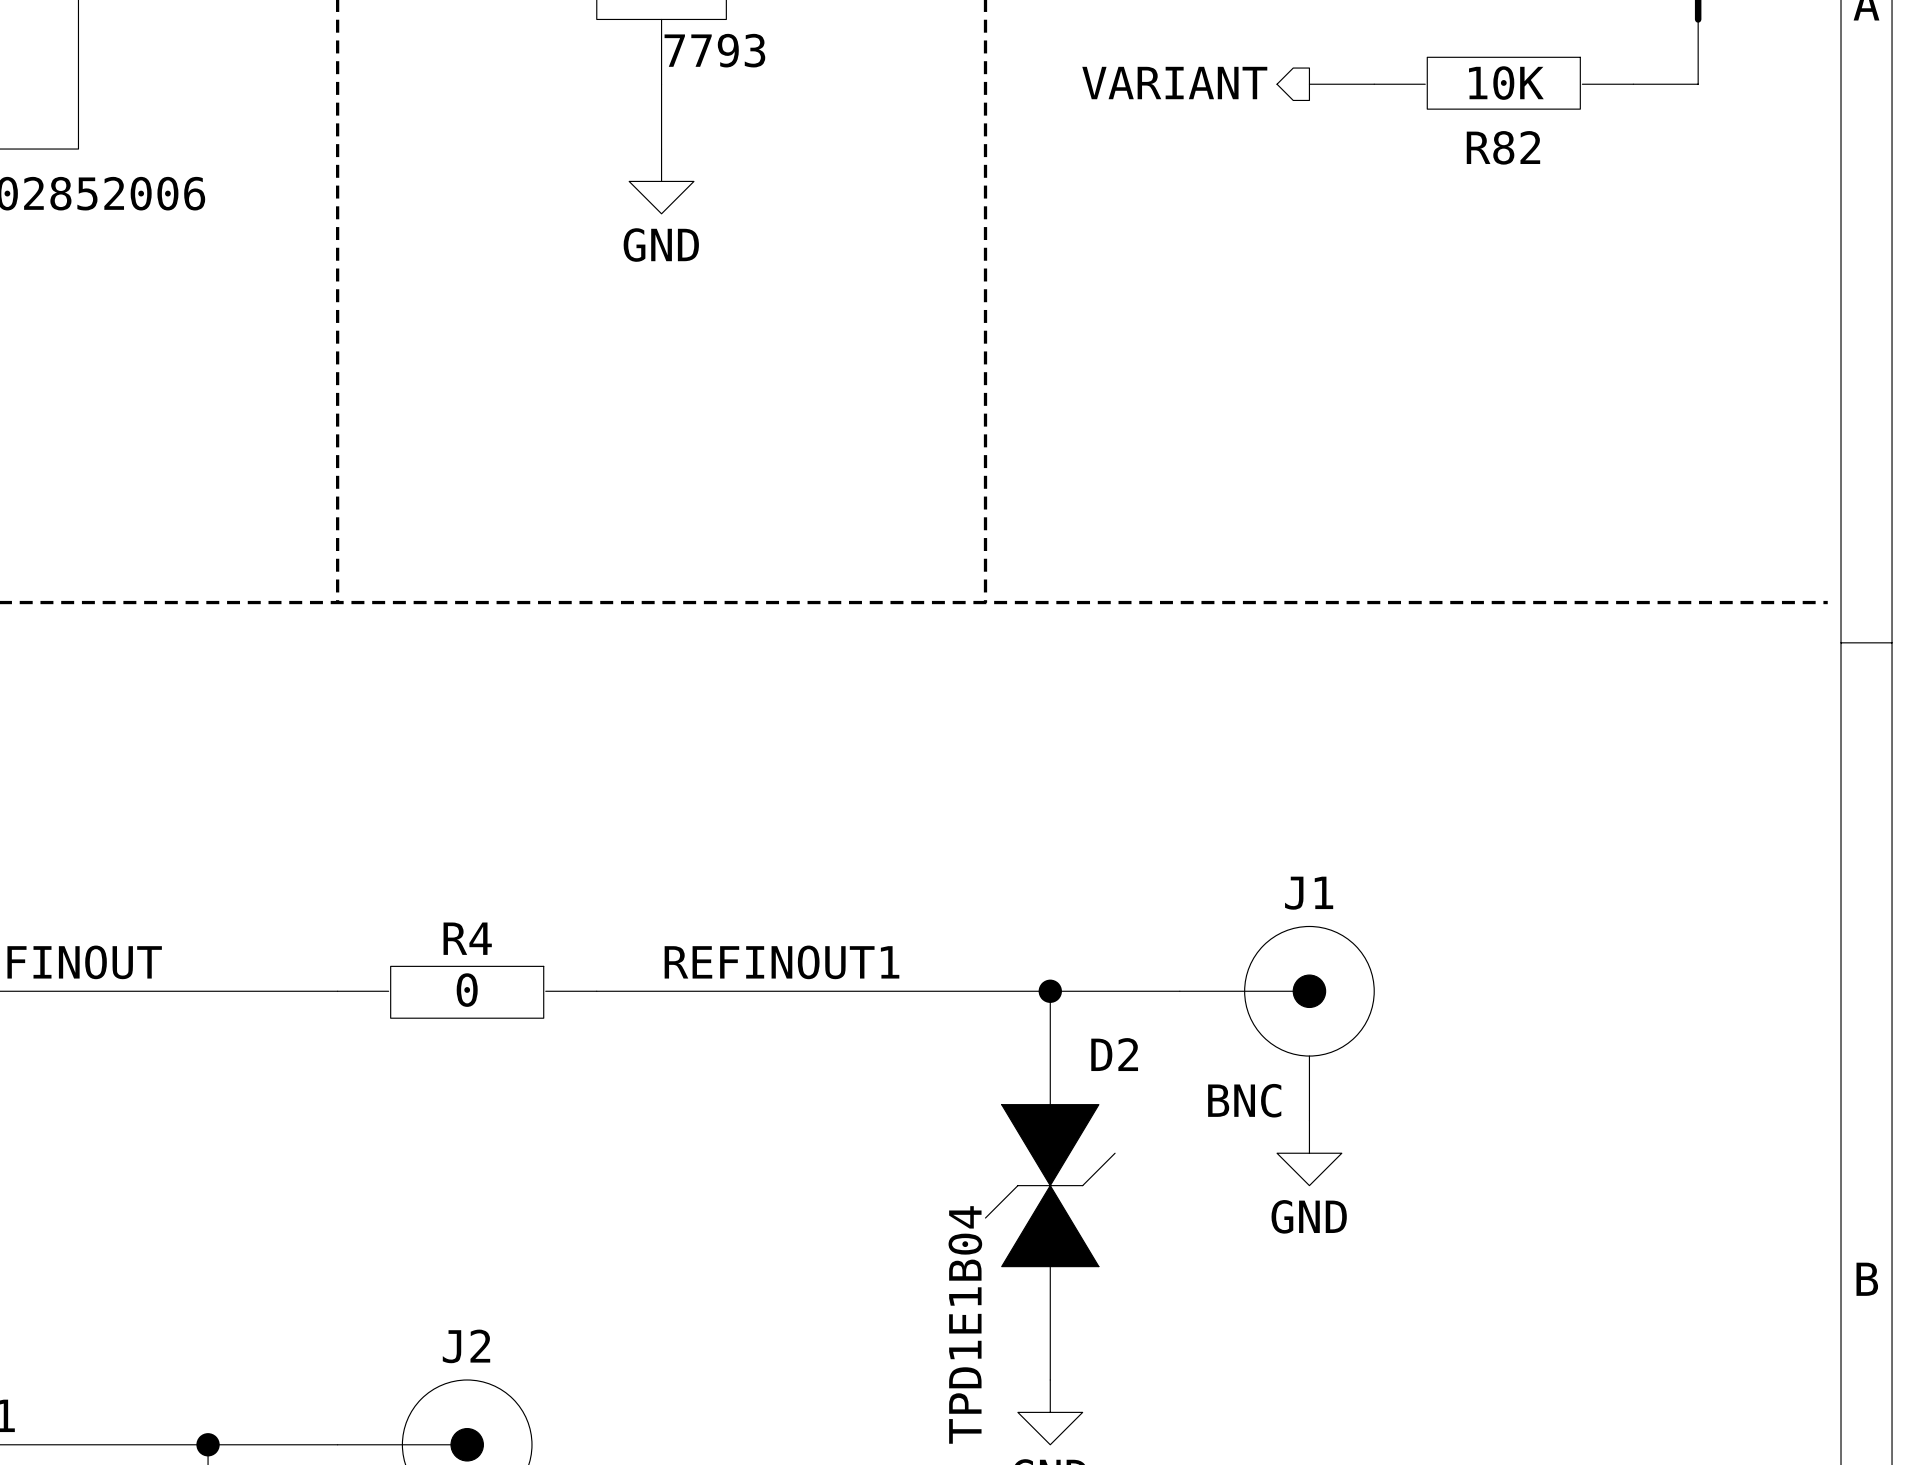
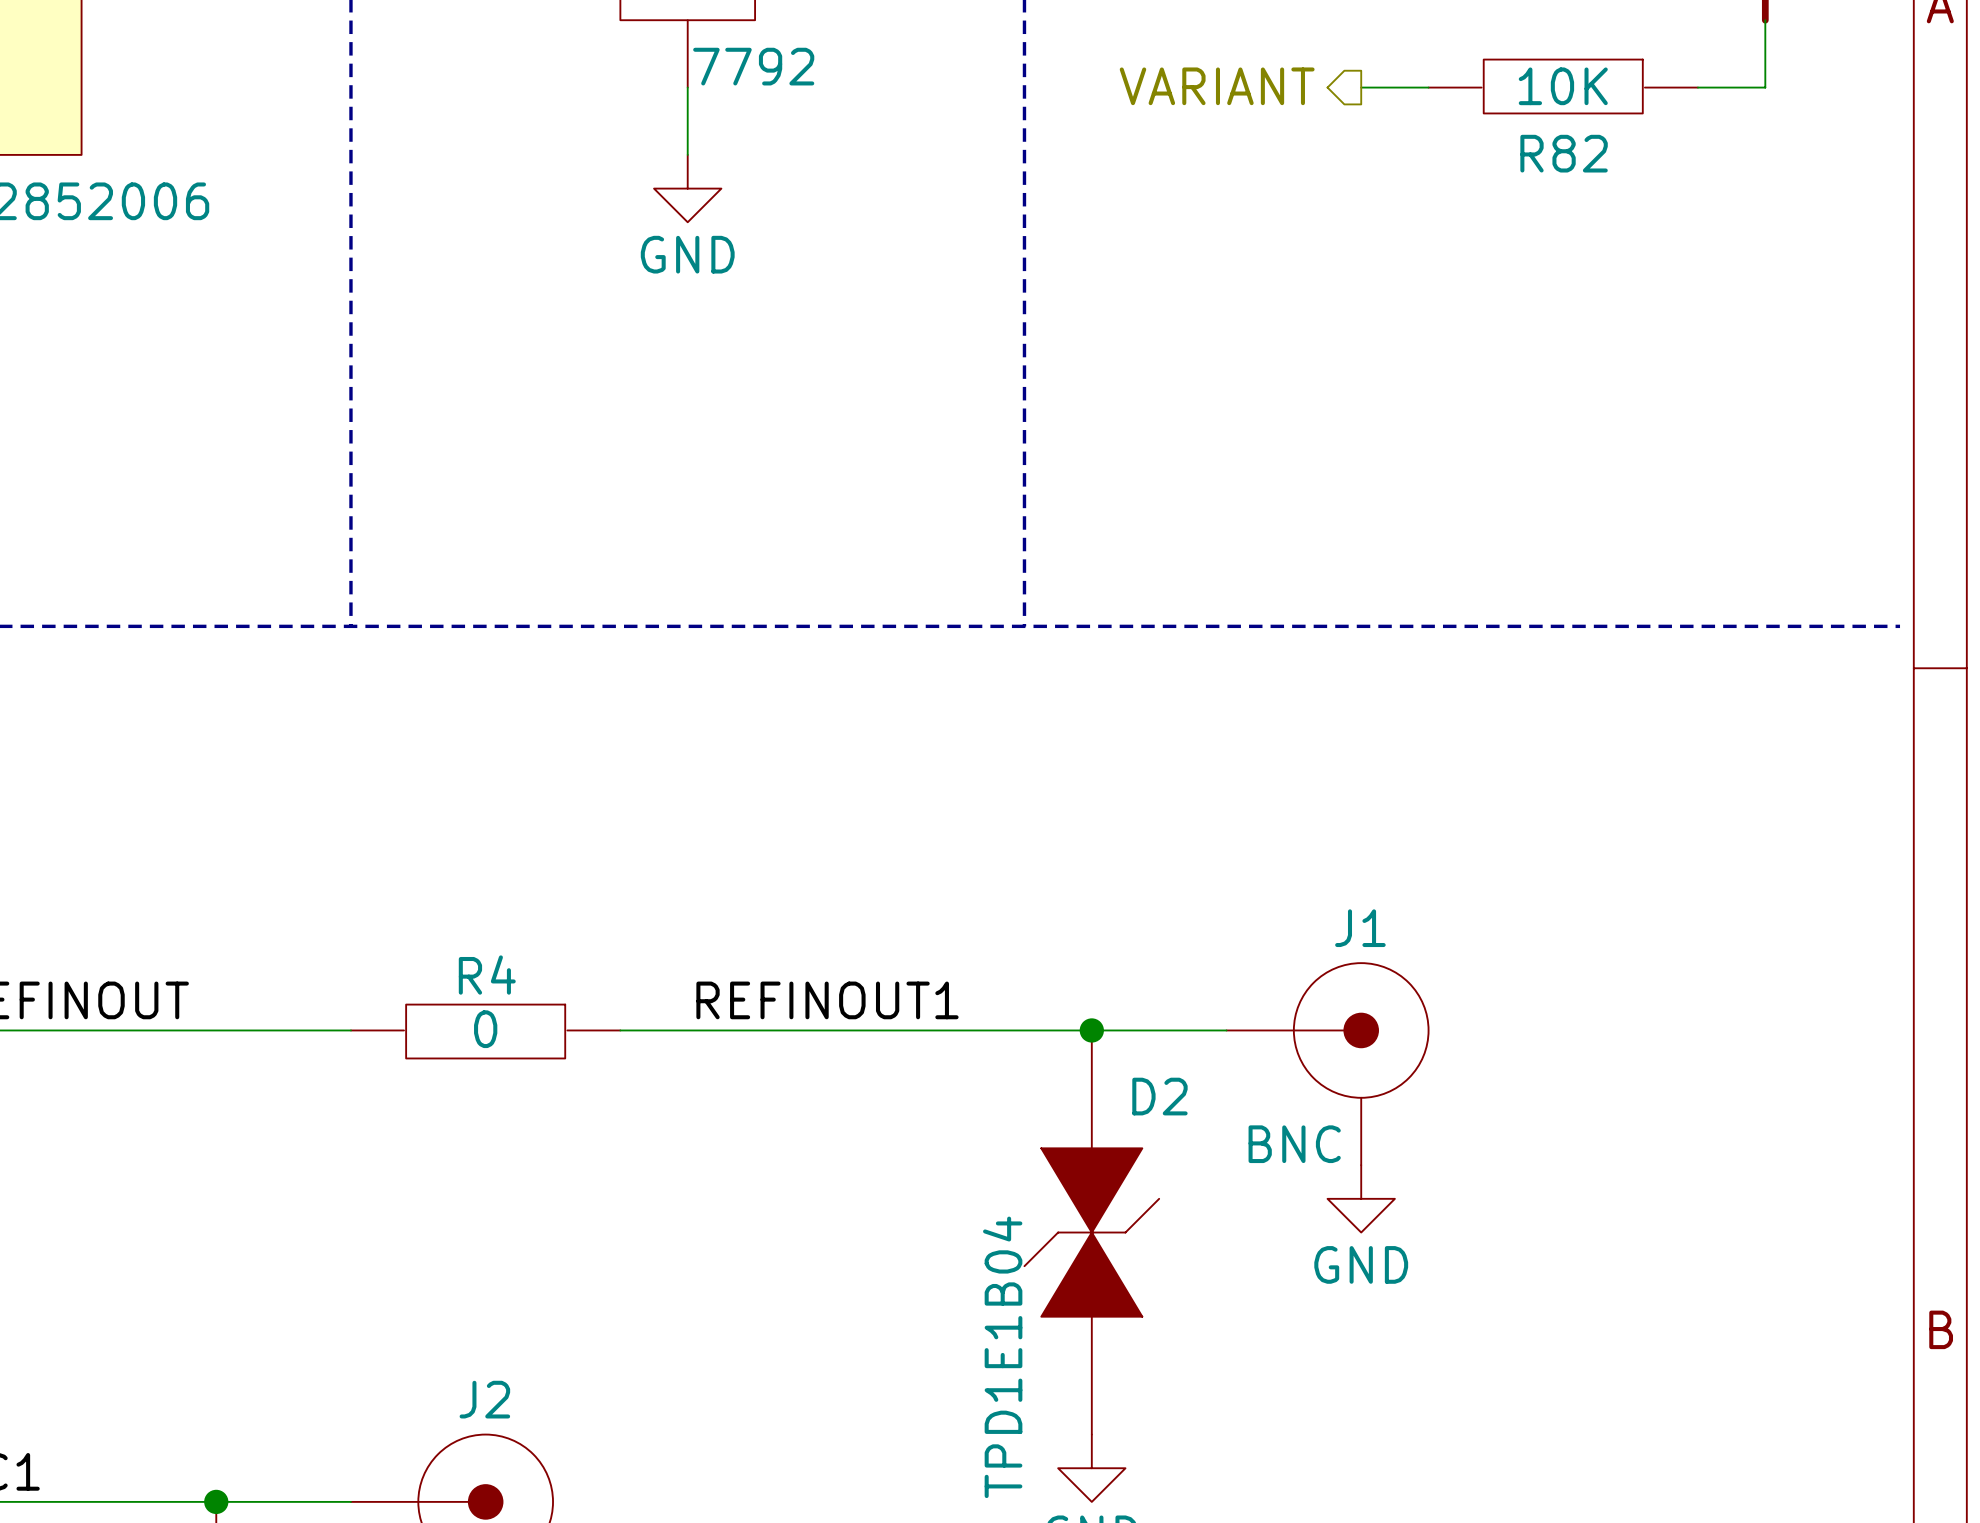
part value: 7793 (714, 50) -> 7792 (753, 66)

